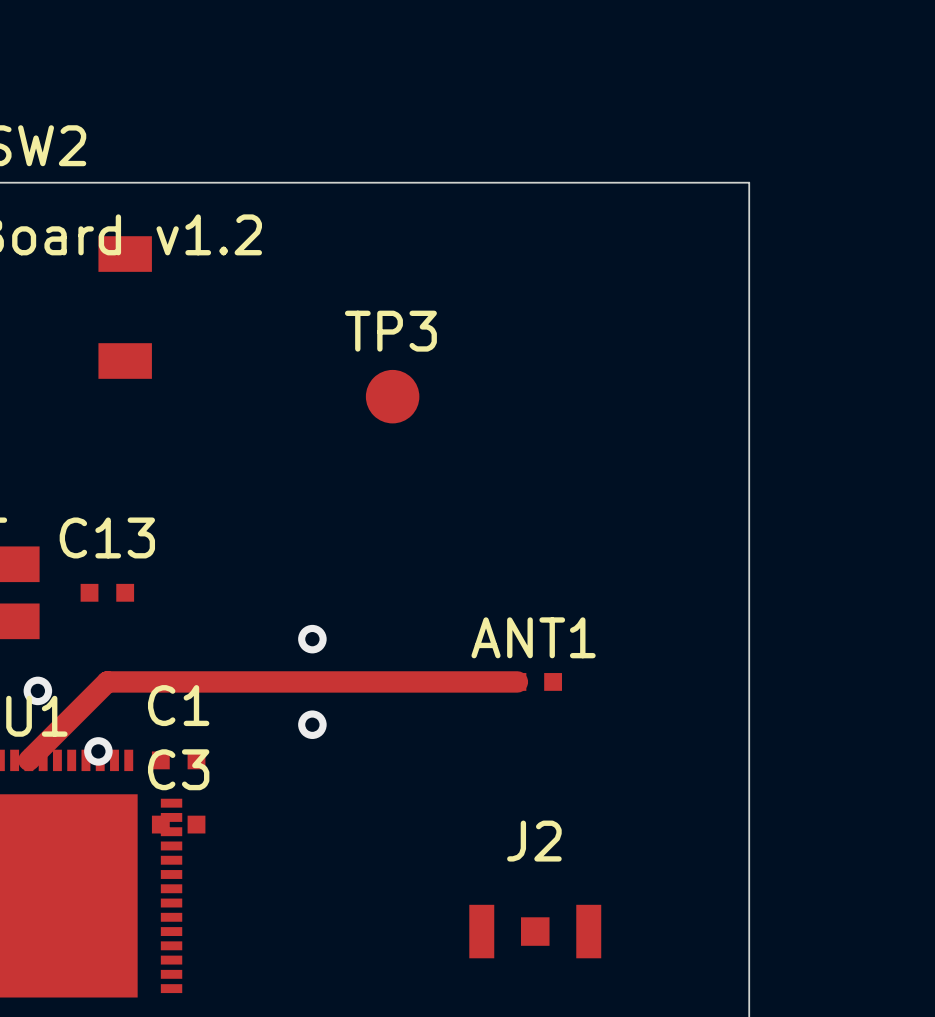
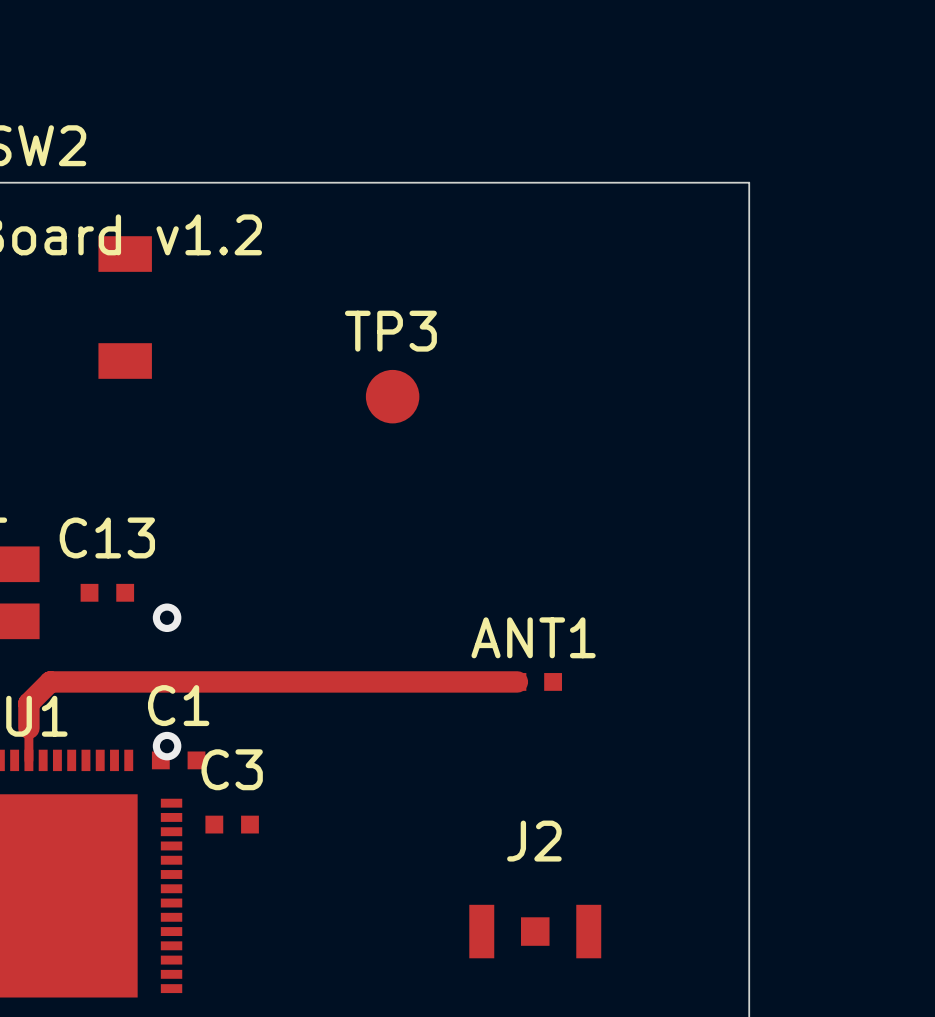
via: none -> (167, 617)
via: (312, 639) -> none
track: (107, 681) (28, 760) -> (107, 681) (50, 681) (28, 703) (28, 760)
via: (37, 690) -> none
via: (312, 724) -> none
via position: (98, 751) -> (167, 746)
C3 position: (178, 824) -> (232, 824)

